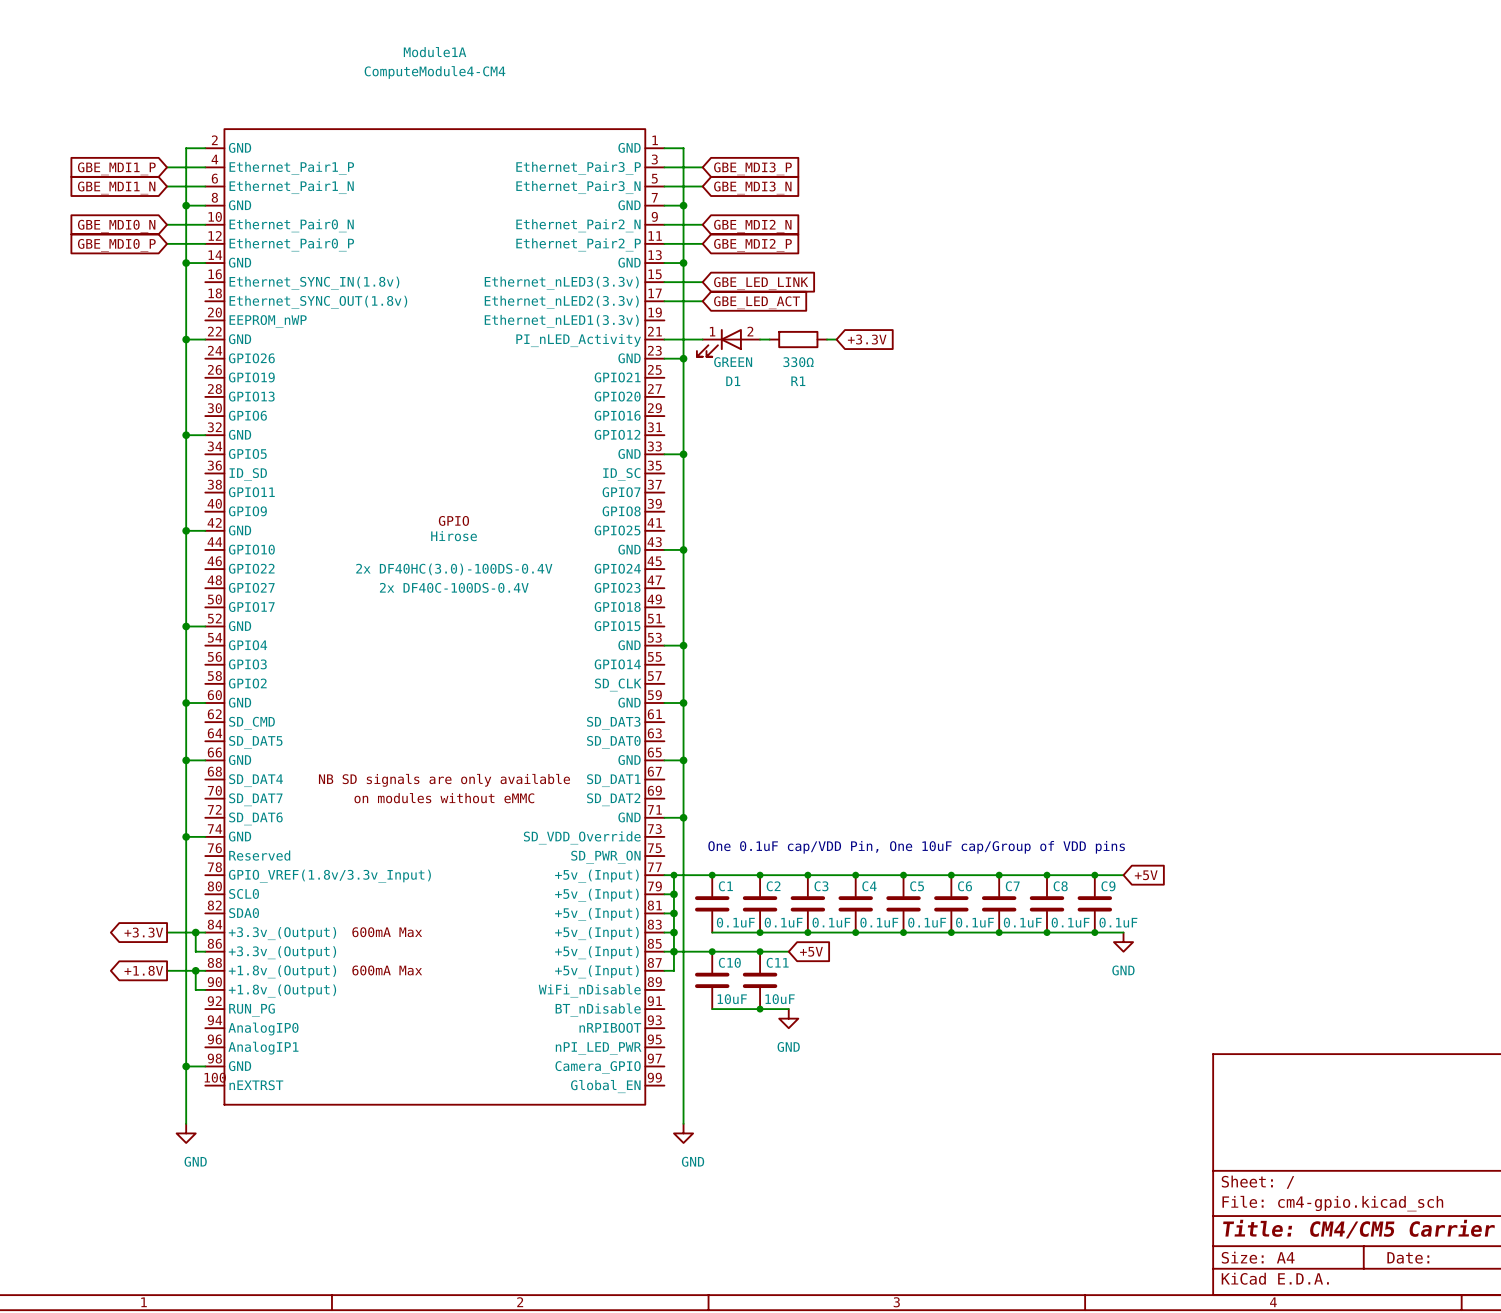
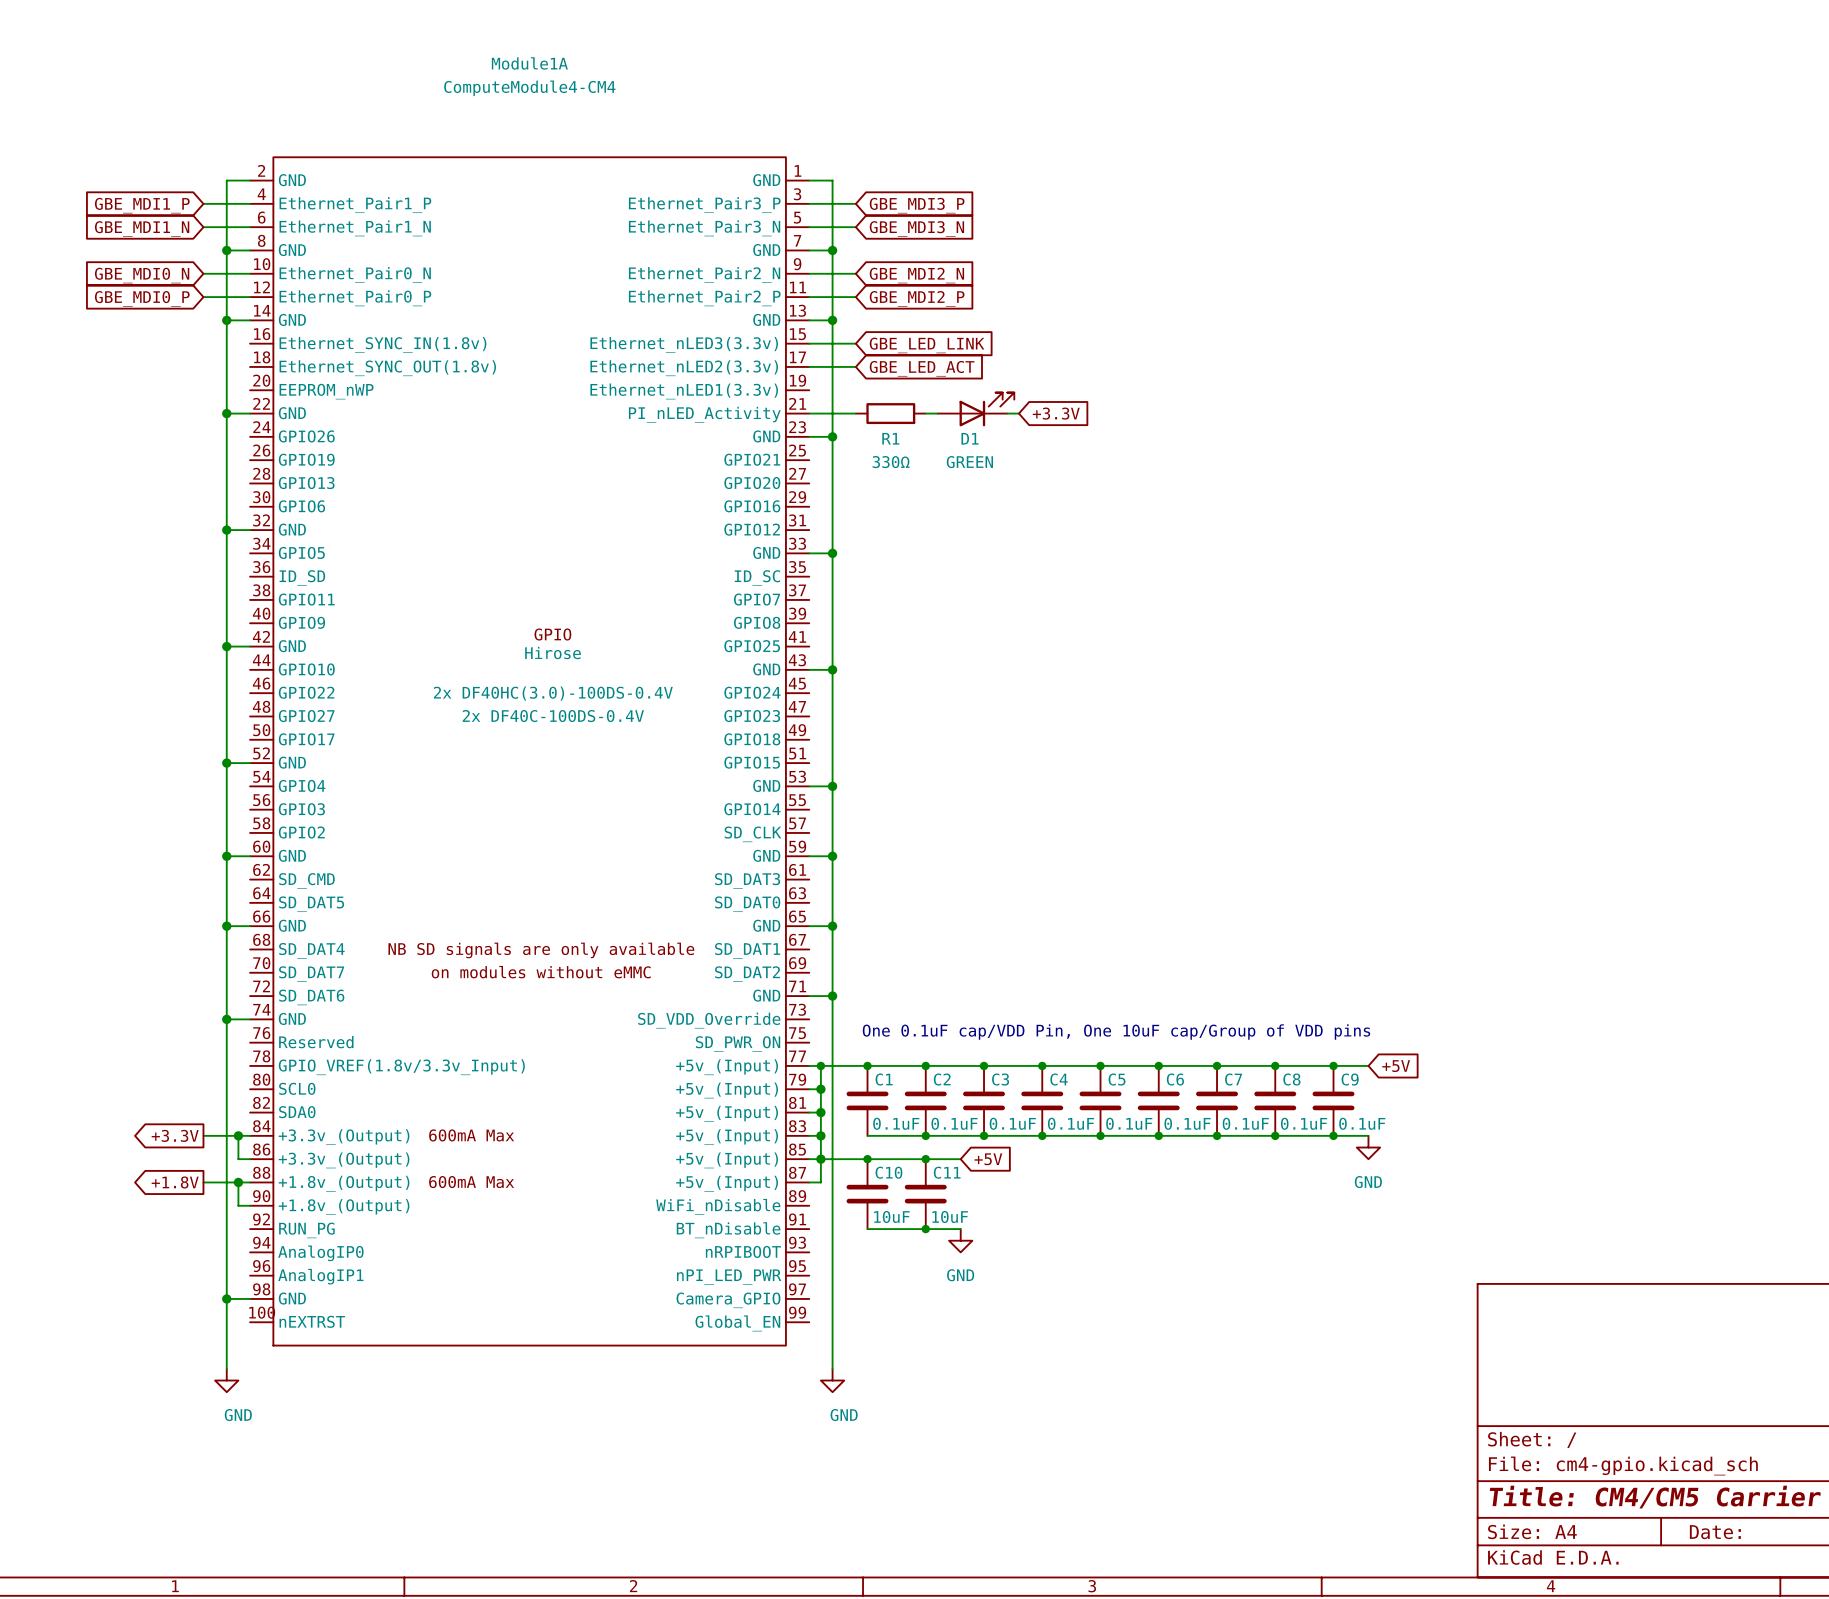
D1 symbol: [696, 329, 761, 357] -> [937, 392, 1015, 427]
R1 position: (798, 339) -> (890, 413)
D1 value position: GREEN (733, 362) -> GREEN (969, 462)
R1 value position: 330Ω (798, 362) -> 330Ω (891, 462)
D1 name position: D1 (733, 381) -> D1 (970, 438)
R1 name position: R1 (798, 381) -> R1 (890, 438)

